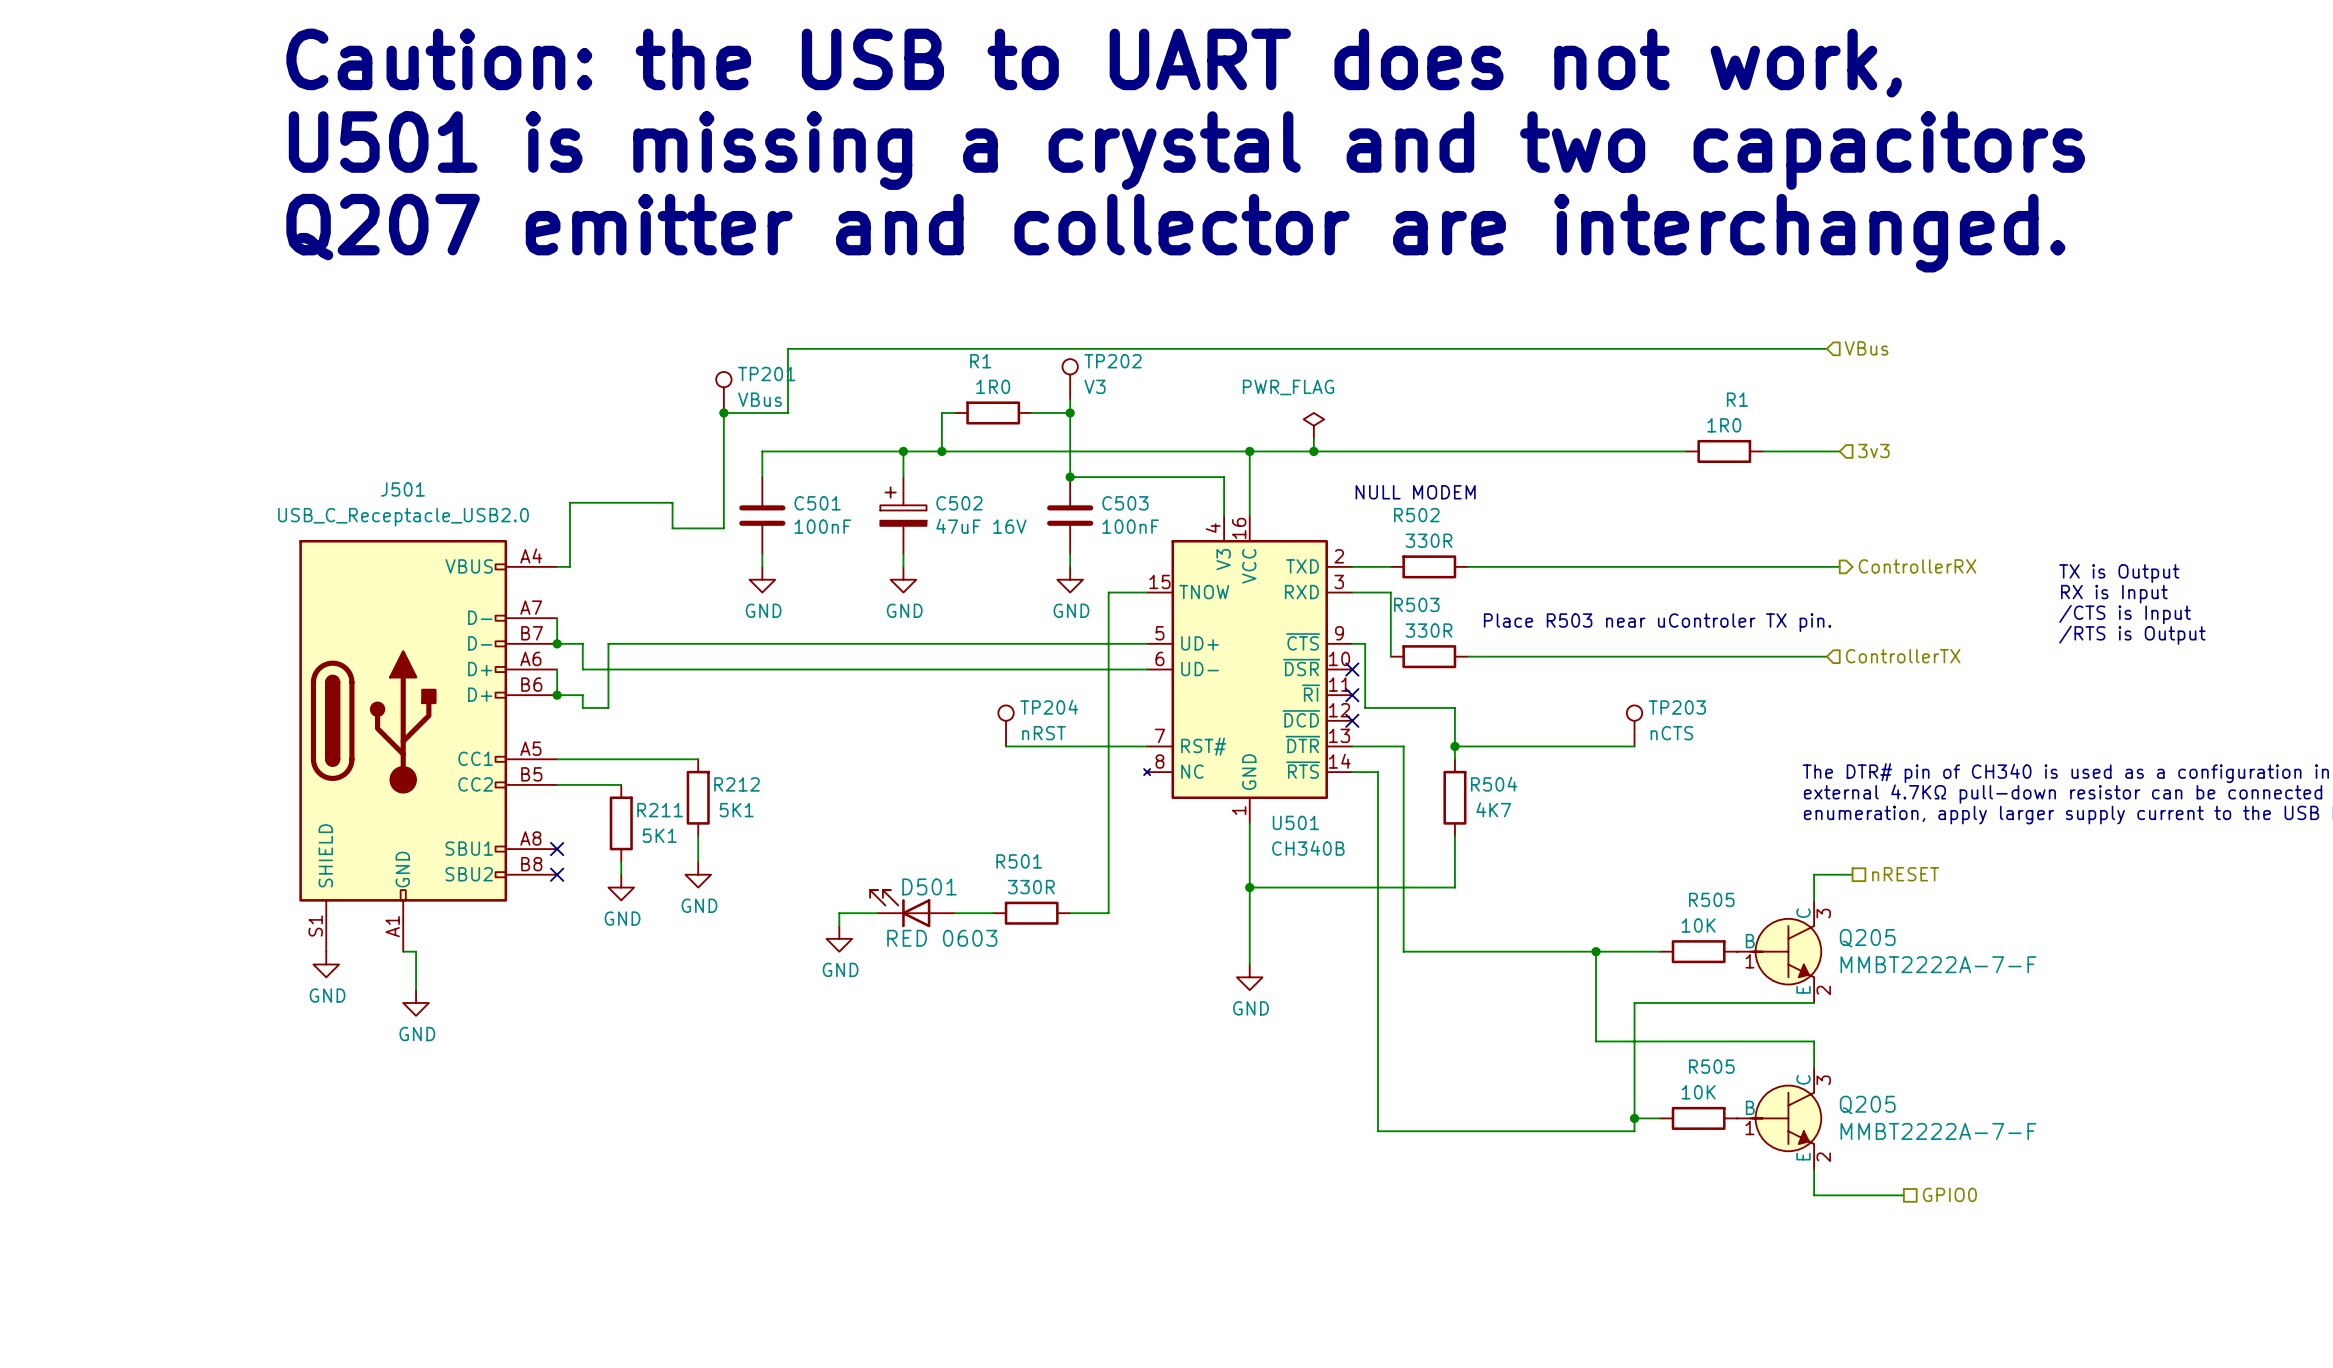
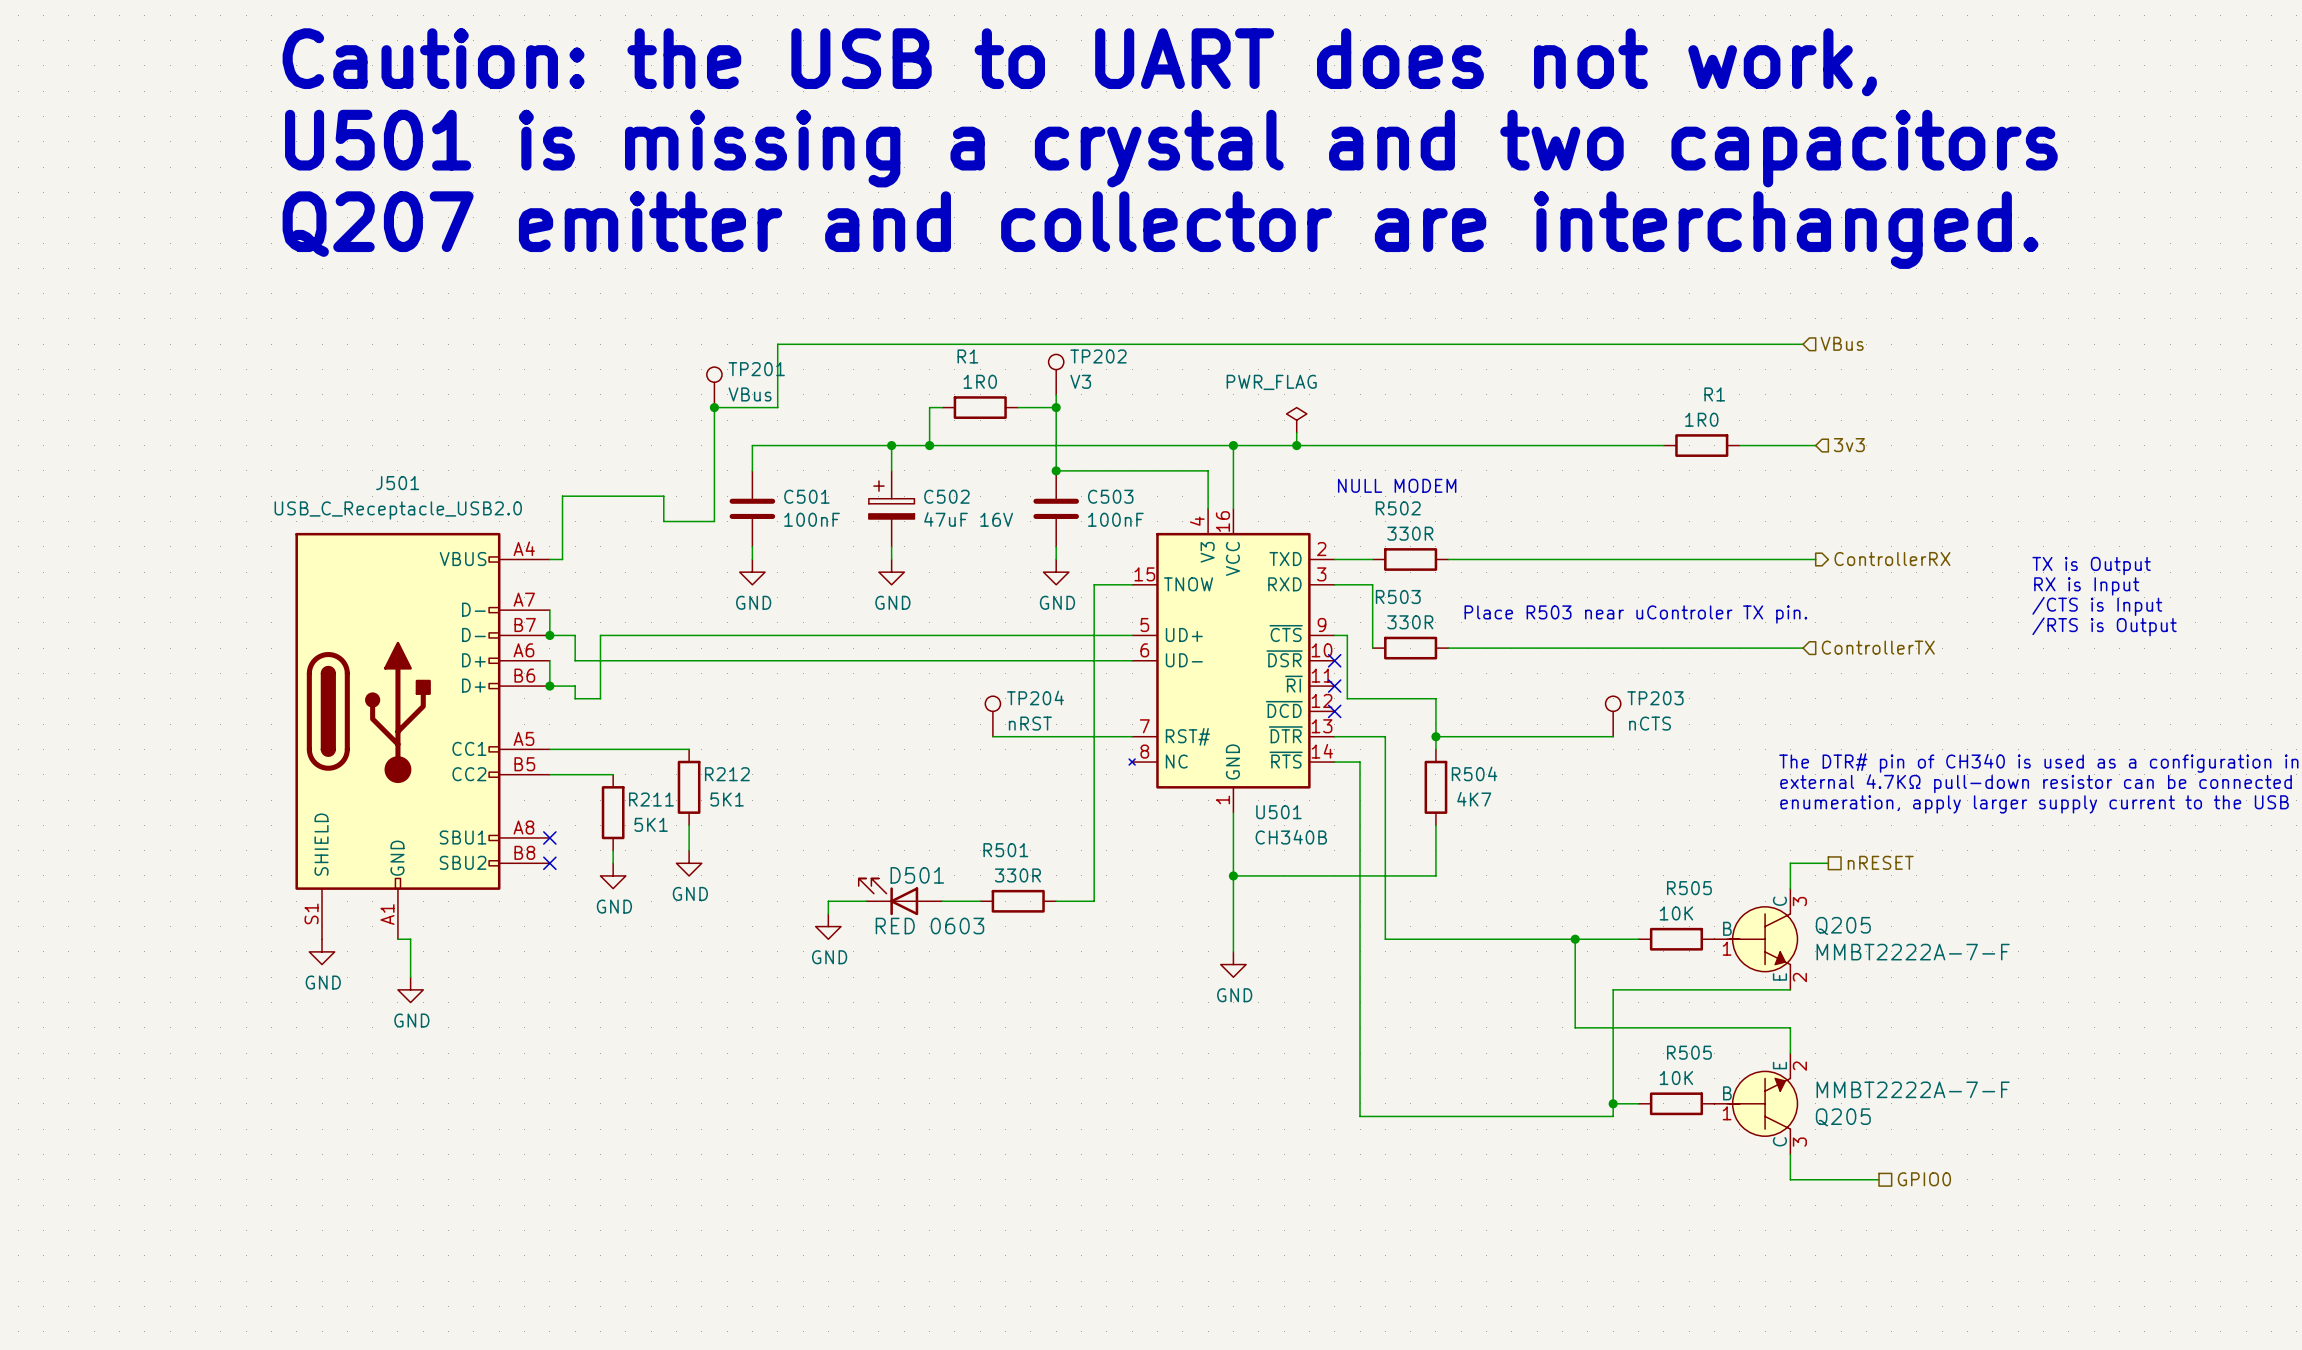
Q205 flip: as is (1785, 1118) -> up-down (1762, 1103)

